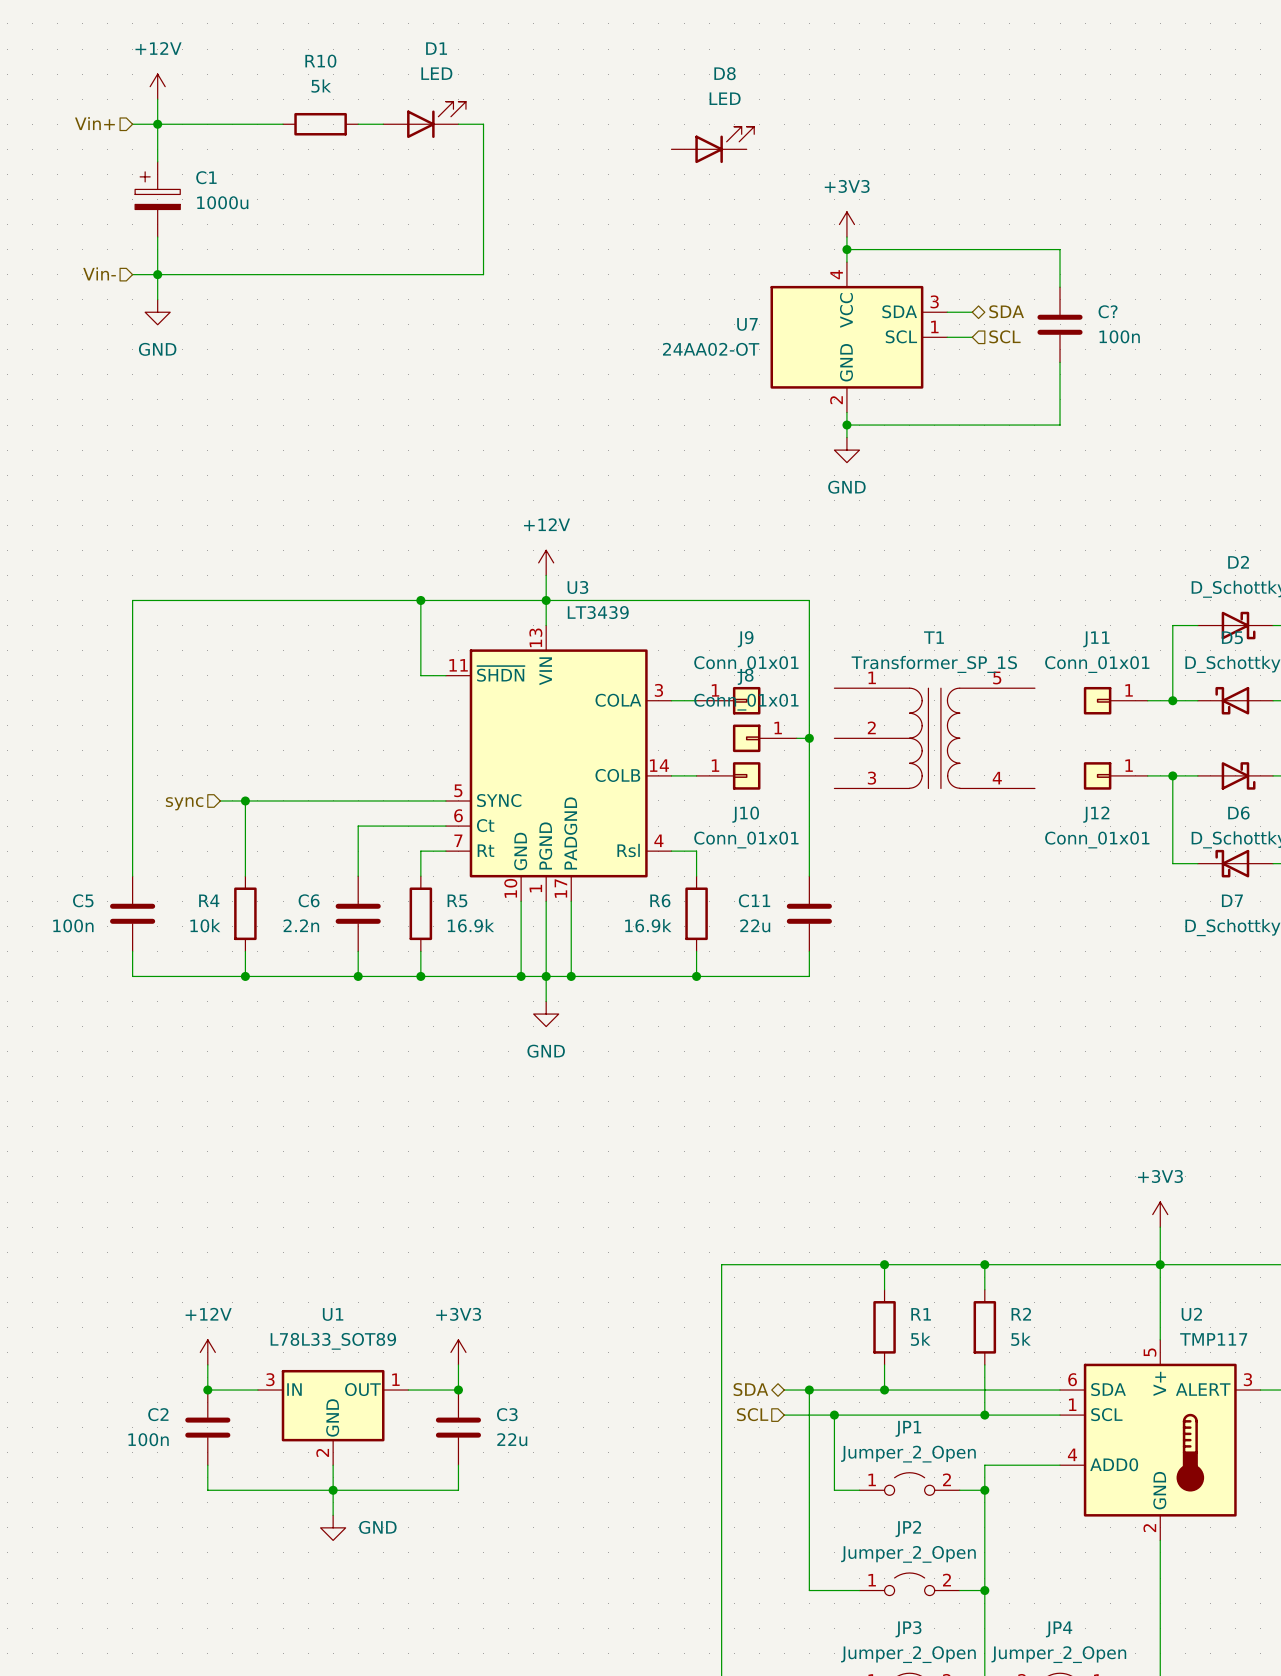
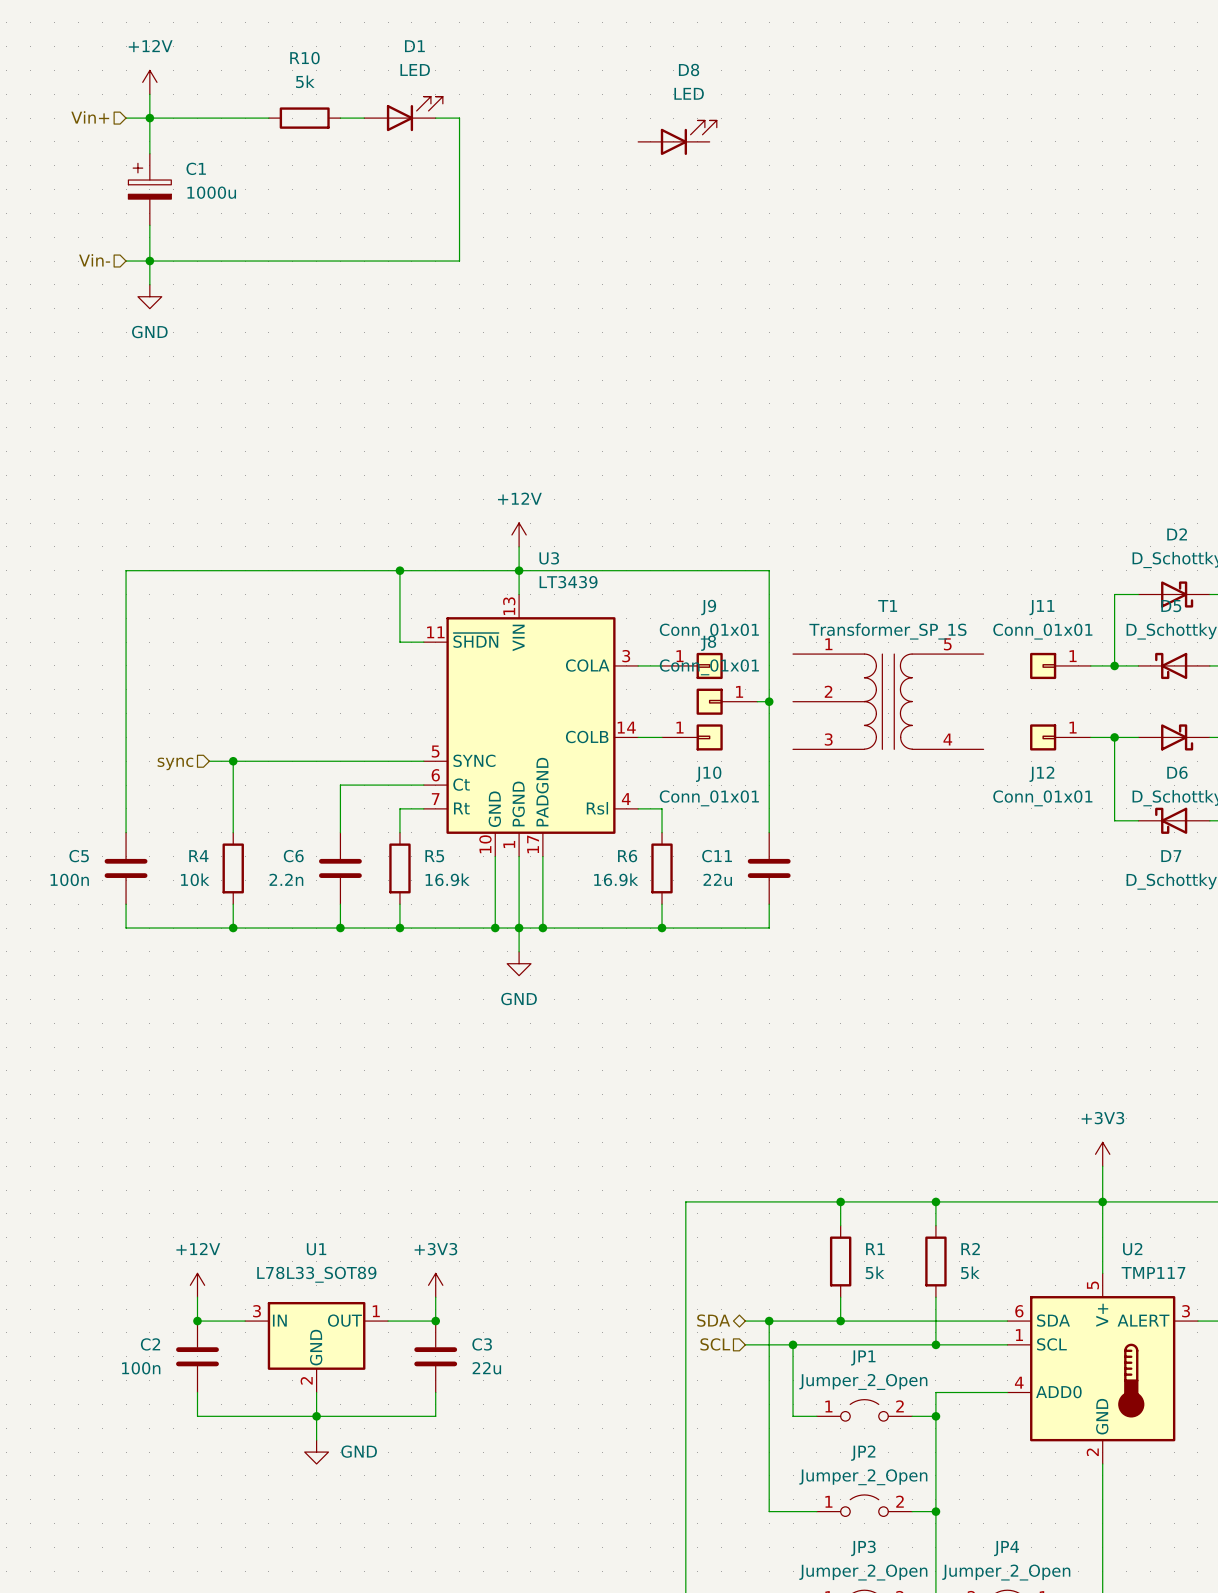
power symbol: +3V3 (846, 224) -> none
wire: (846, 237) (846, 262) -> none
wire: (846, 249) (1060, 249) (1060, 287) -> none
junction: (846, 249) -> none
hierarchical label: SDA (1006, 311) -> none
wire: (947, 312) (972, 312) -> none
C?: 100n (1060, 324) -> none
hierarchical label: SCL (1004, 336) -> none
U7: 24AA02-OT (858, 337) -> none
wire: (947, 337) (972, 337) -> none
wire: (1060, 362) (1060, 425) (846, 425) -> none
wire: (846, 412) (846, 437) -> none
junction: (846, 425) -> none
power symbol: GND (846, 450) -> none

